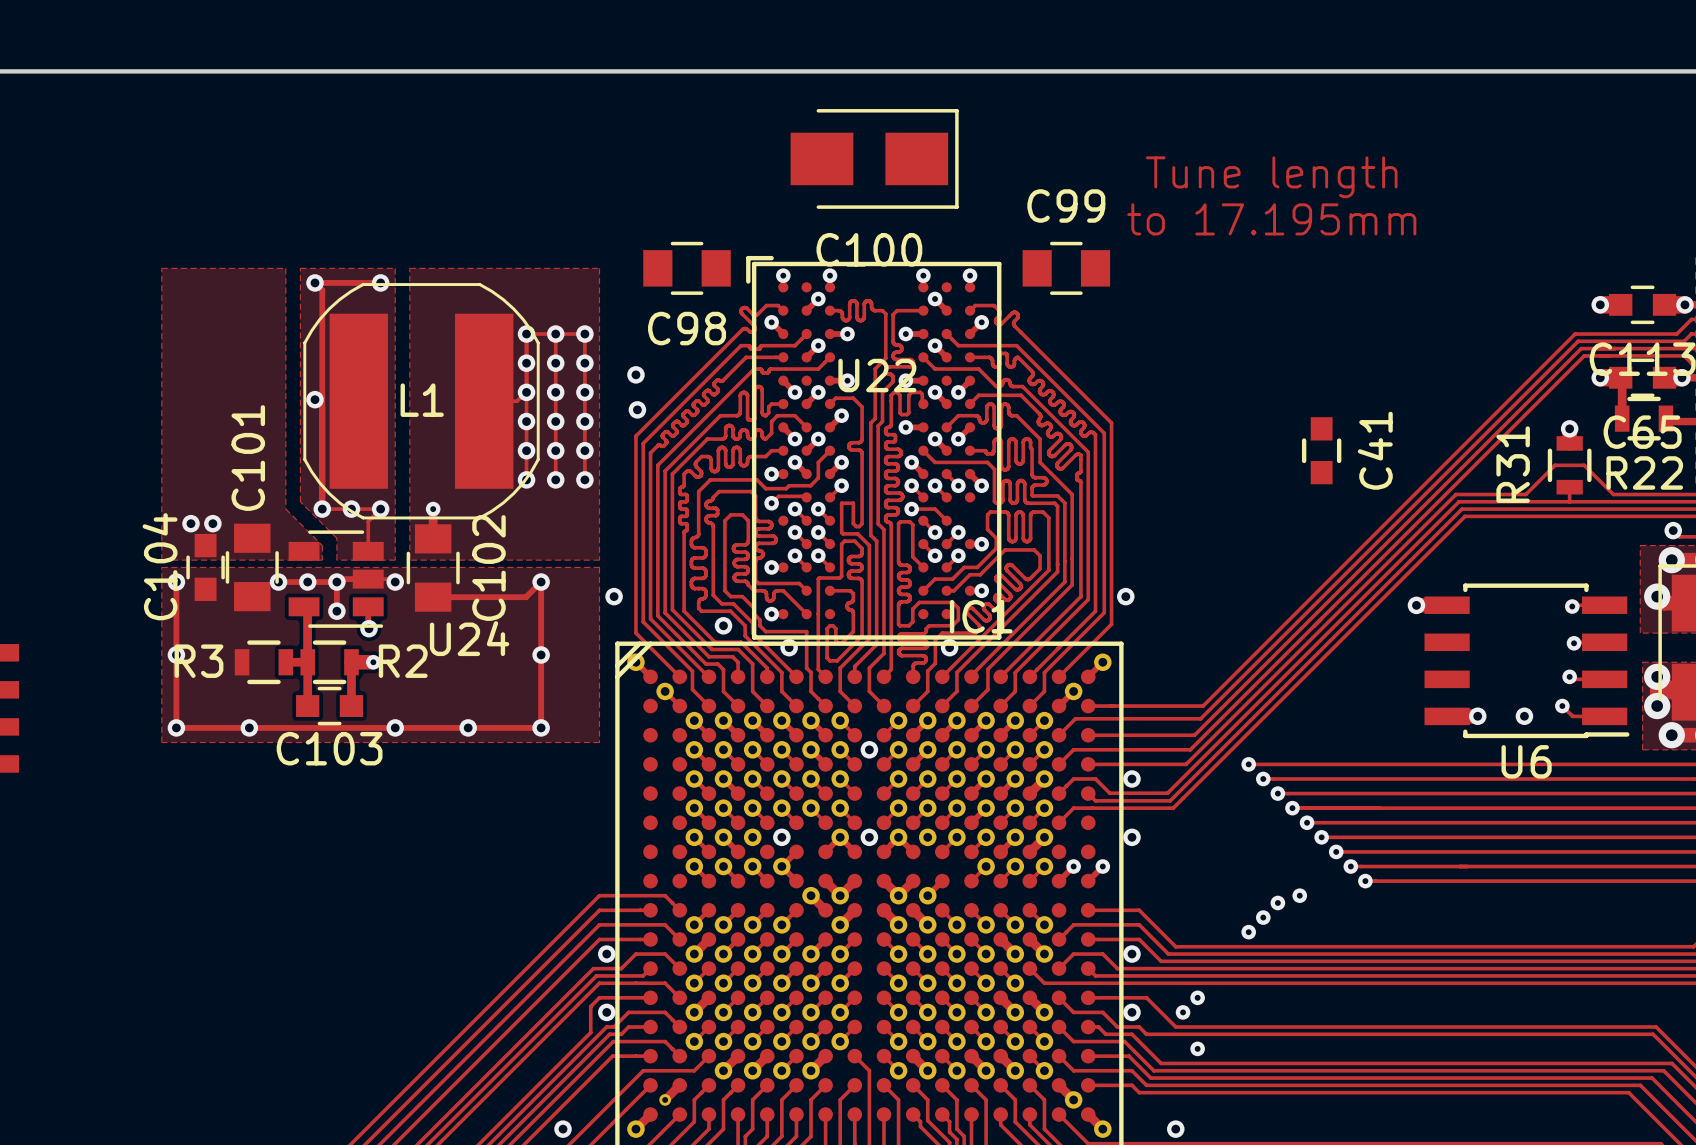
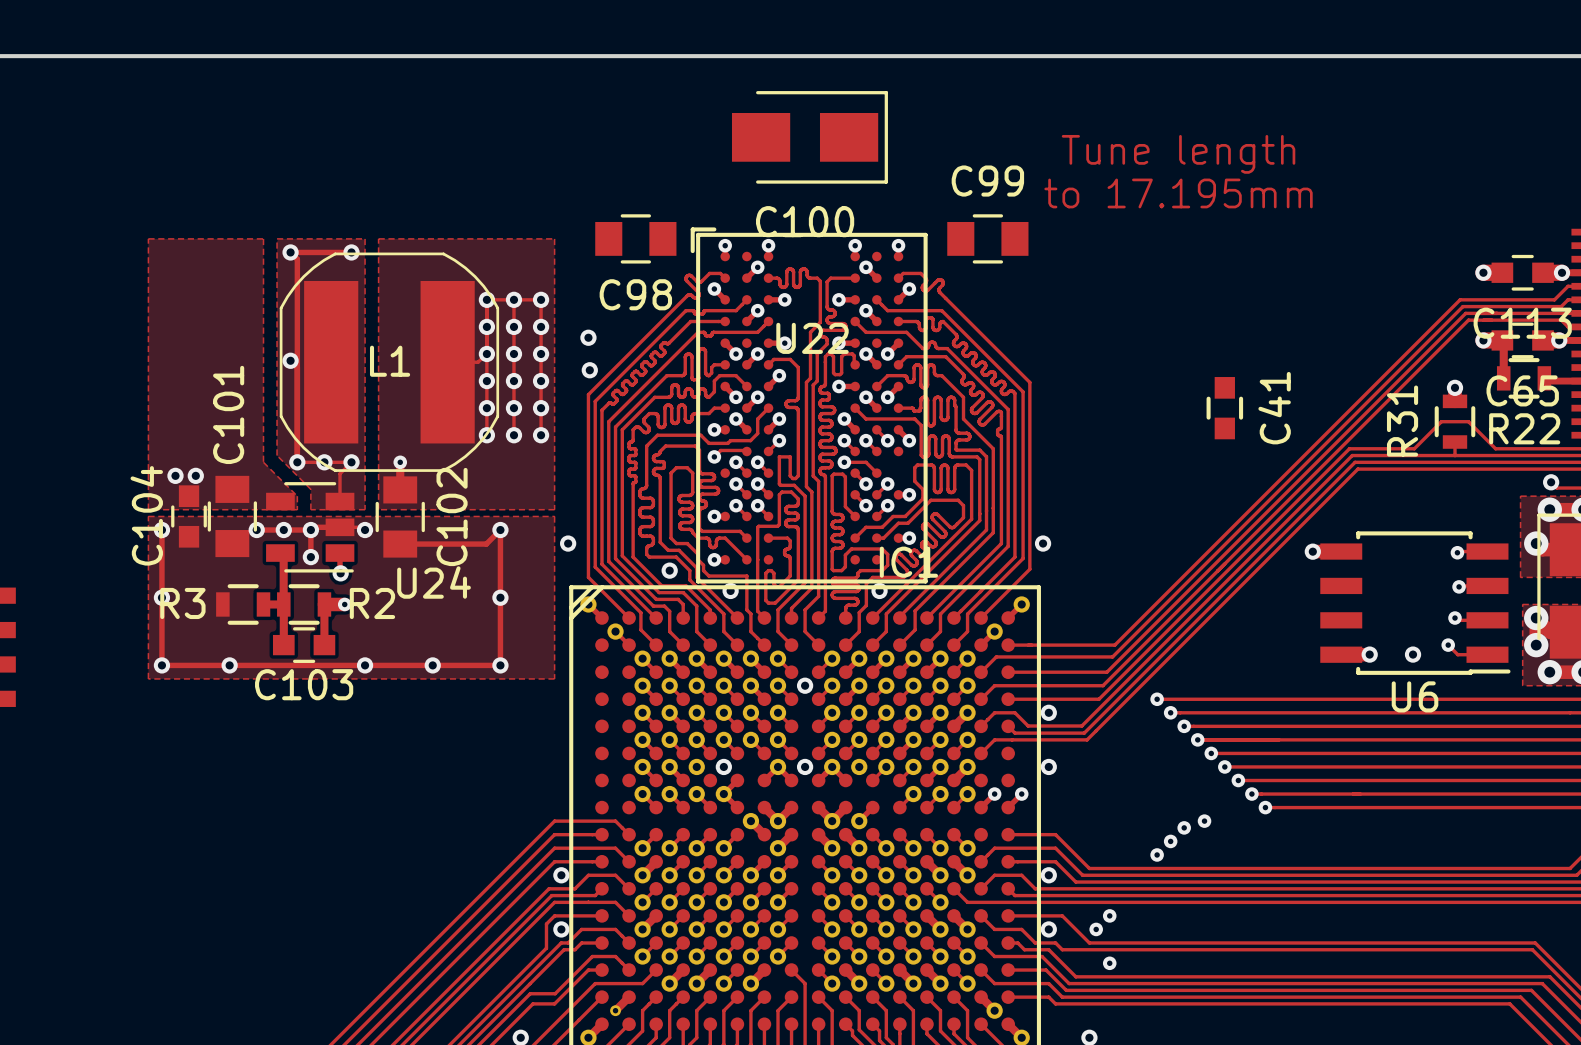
track: (640, 1041) (613, 1041) (573, 1081) -> (592, 956) (555, 993) (530, 993)
track: (635, 1056) (612, 1056) (576, 1092) -> (588, 970) (554, 1003) (532, 1003)

